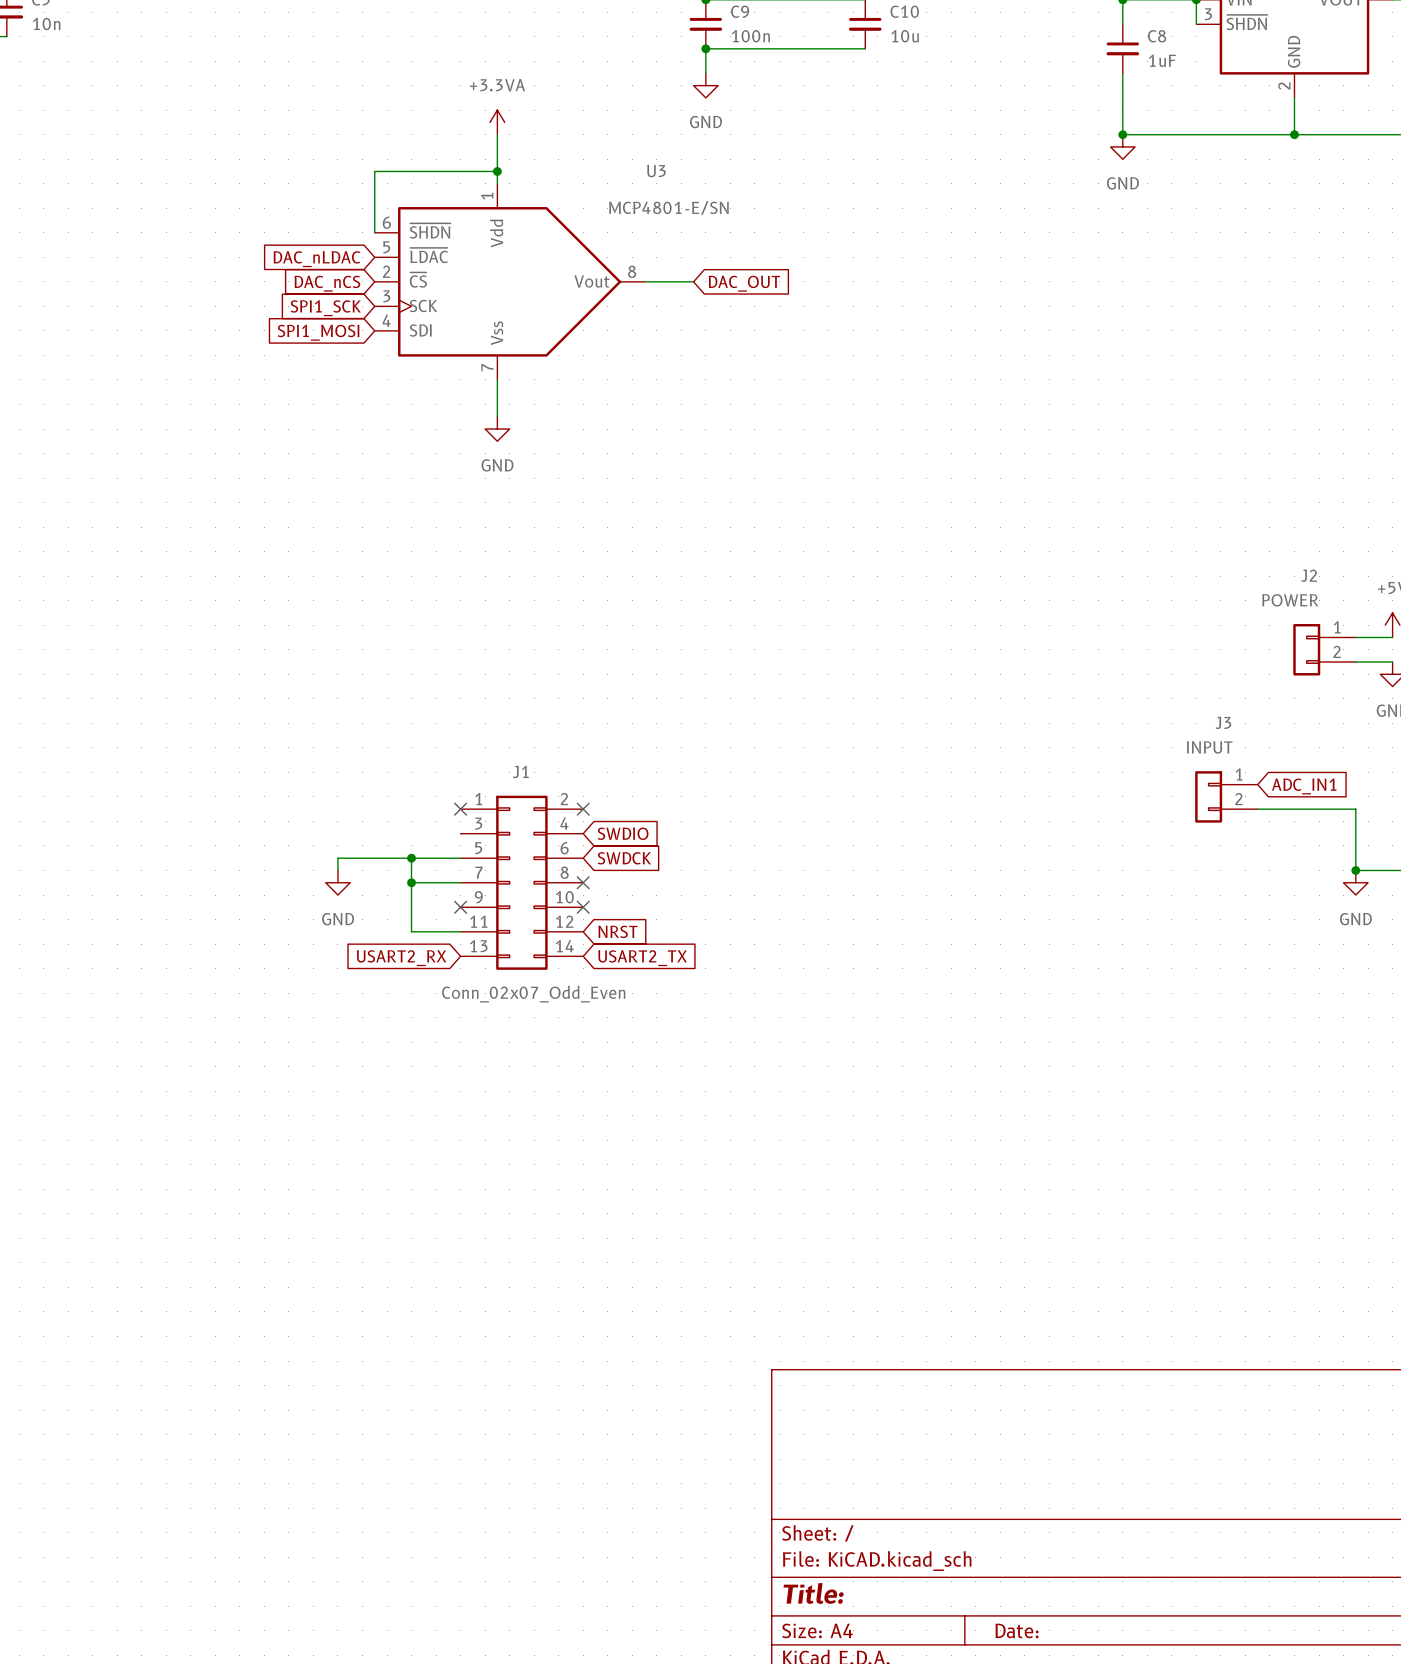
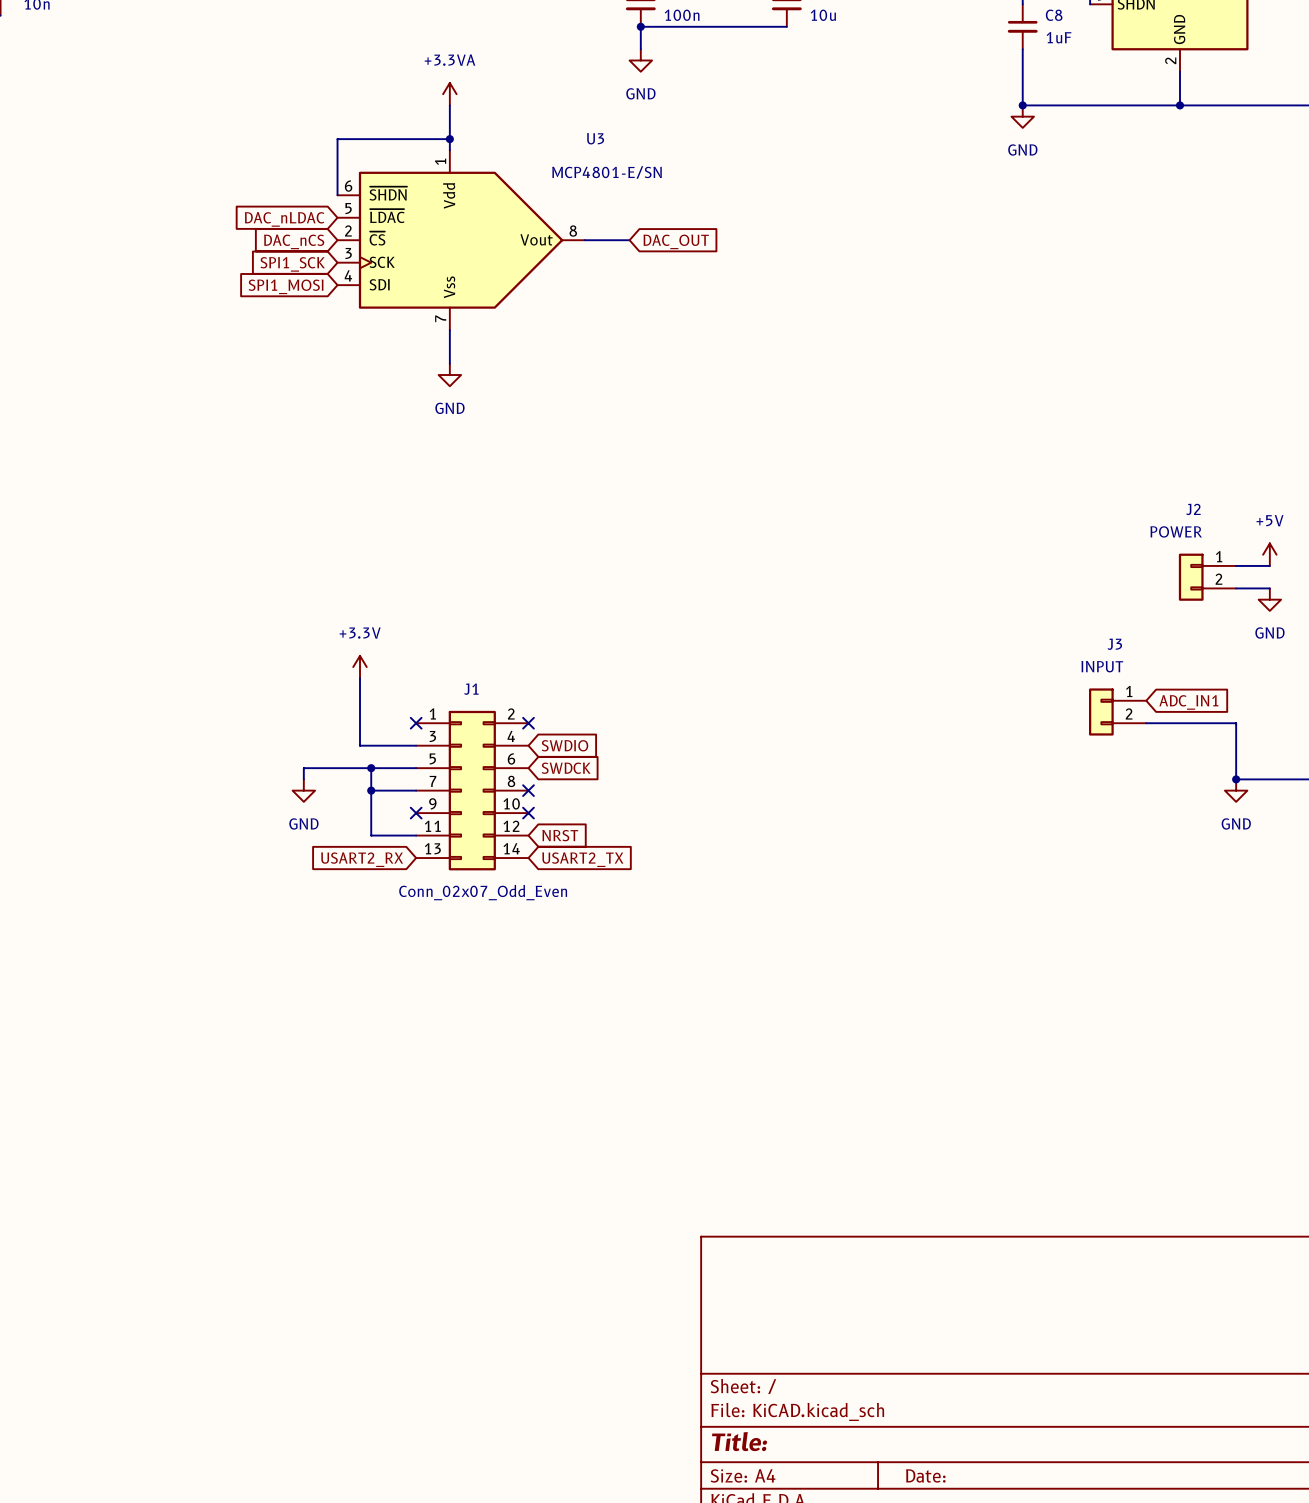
power symbol: none -> +3.3V (360, 667)
wire: none -> (360, 678) (360, 745) (416, 745)

